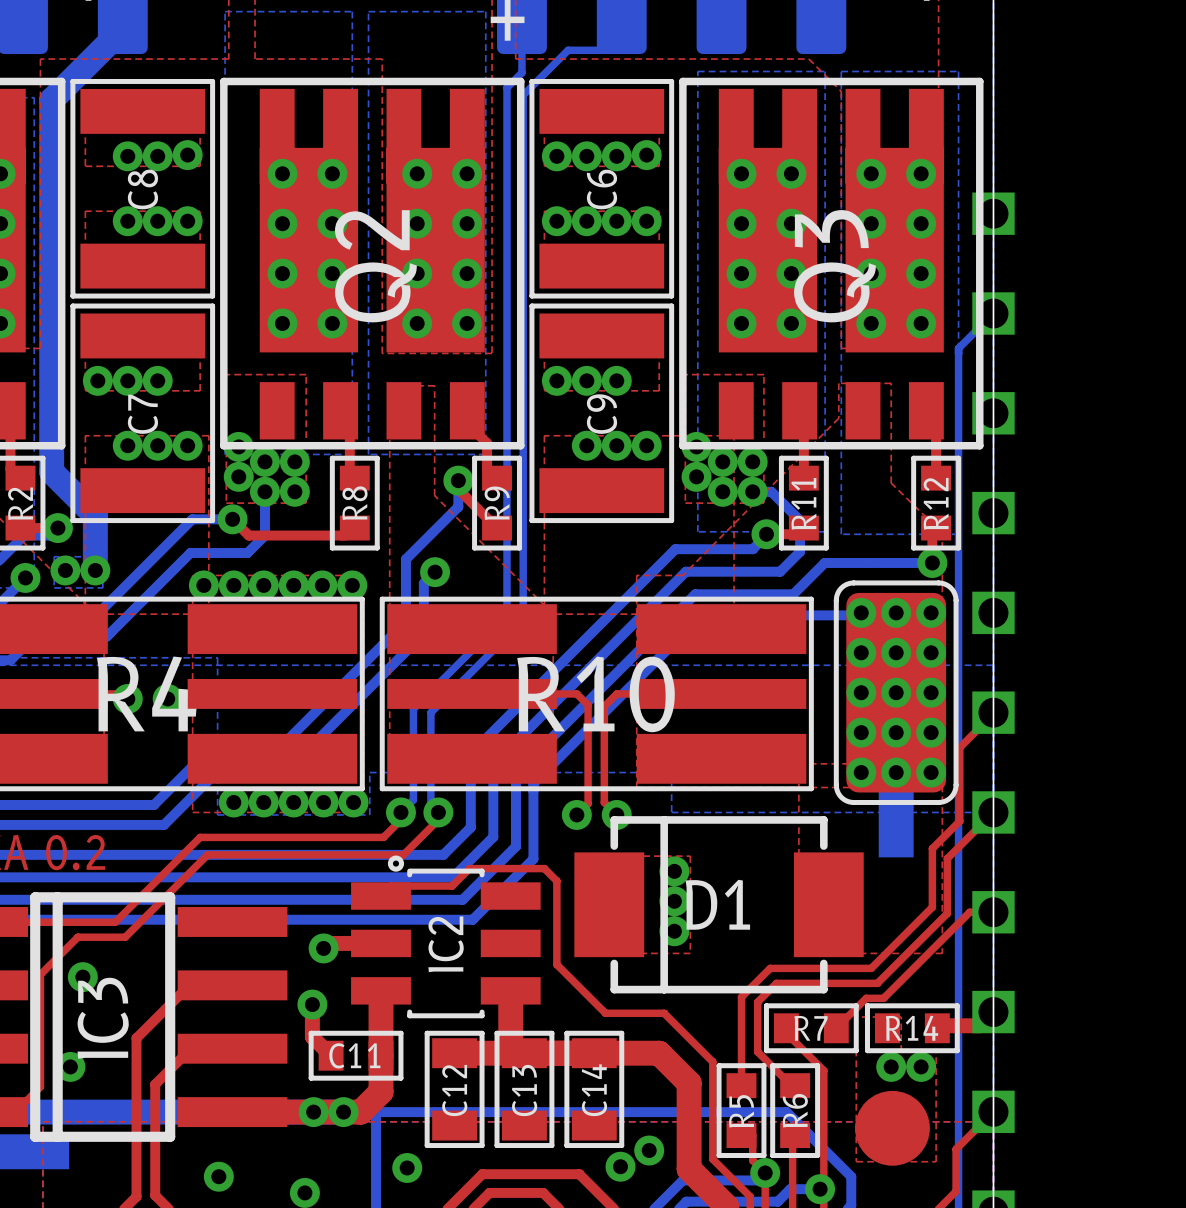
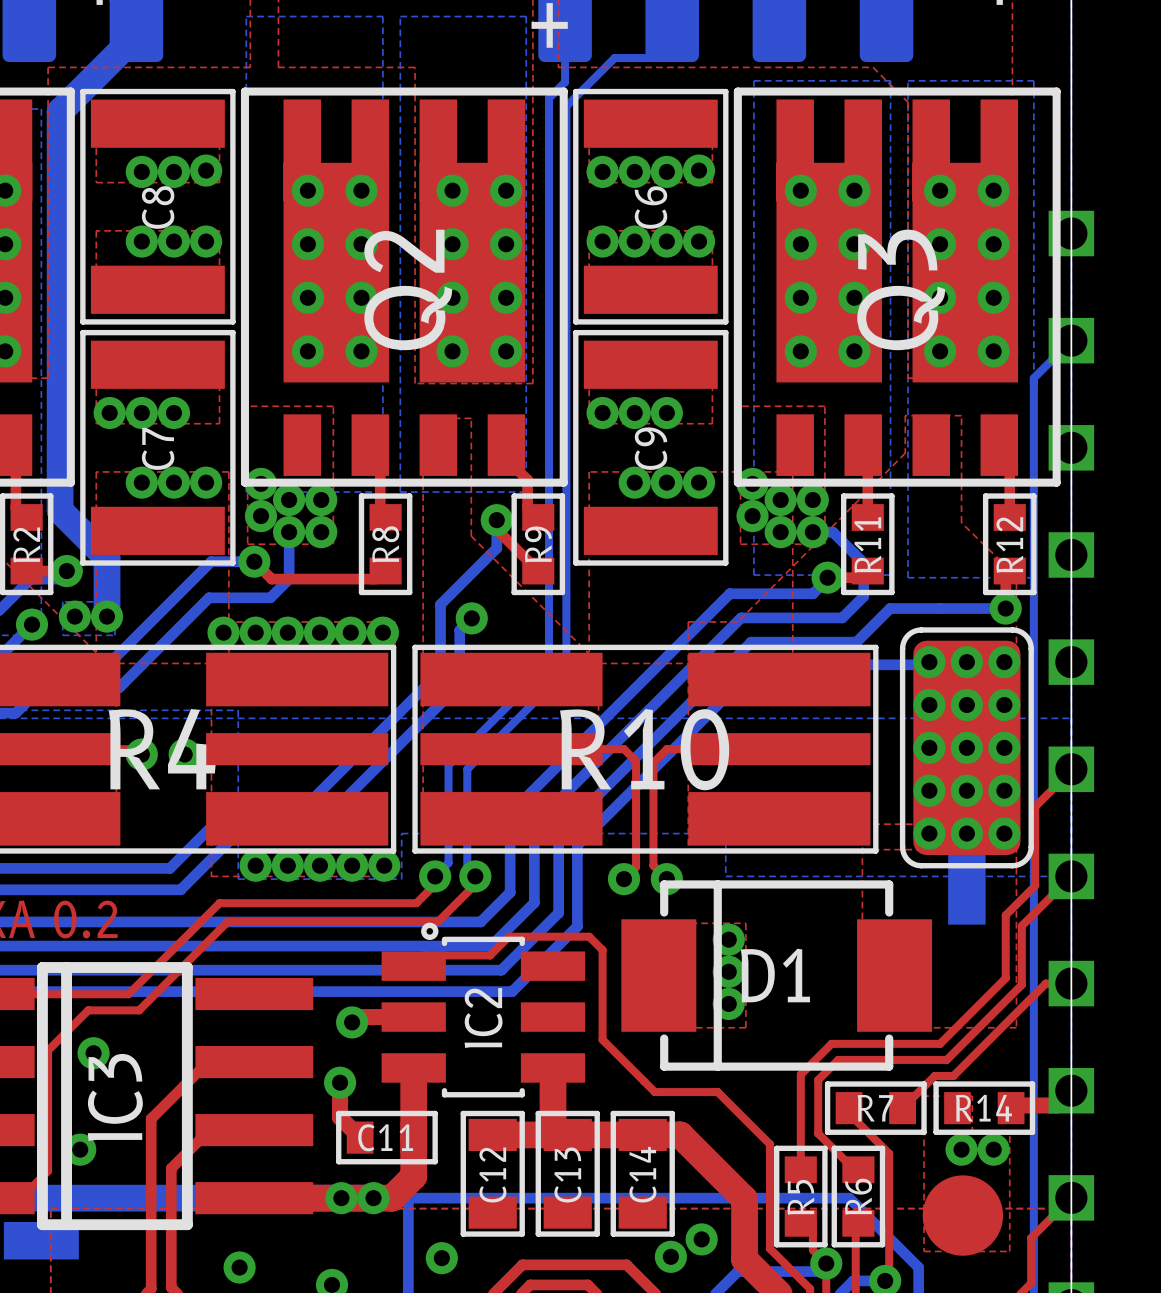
top track: (629, 1053) (659, 1053) (689, 1083) (689, 1113) -> (680, 1134) (744, 1199)

